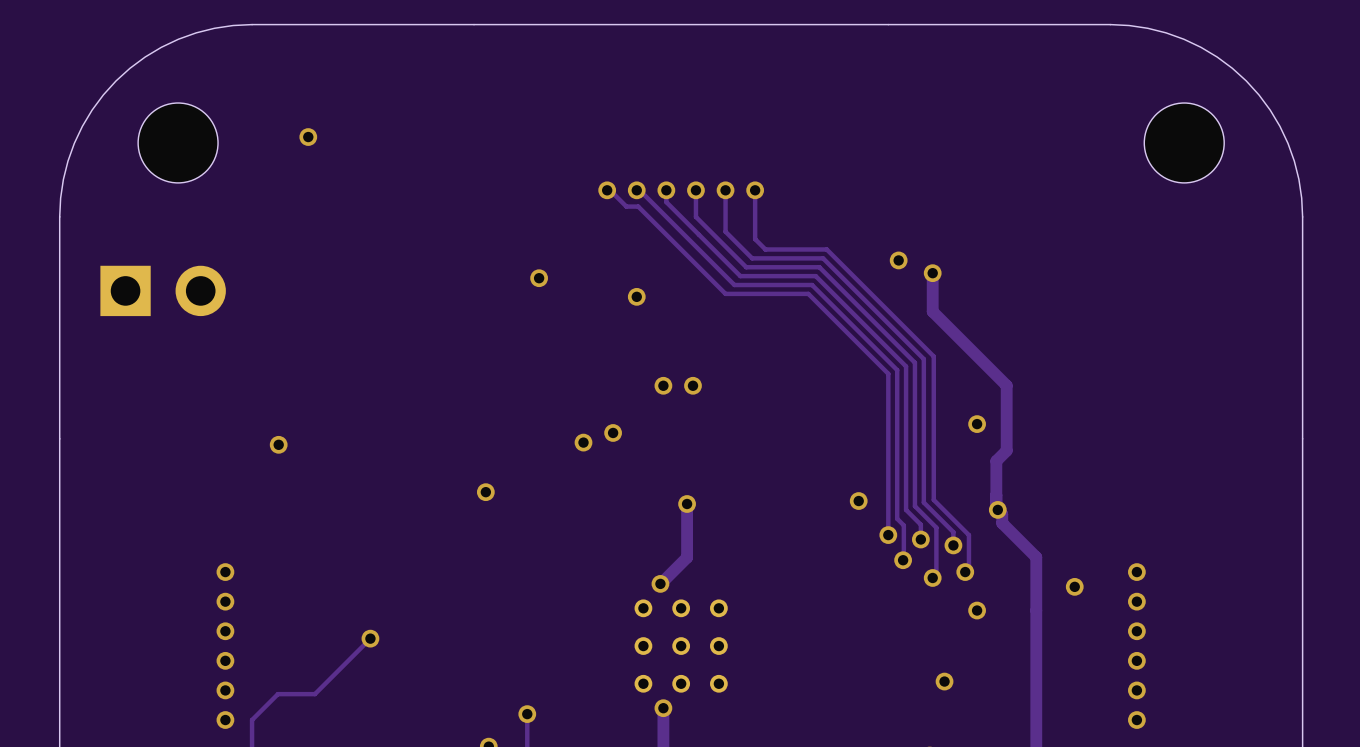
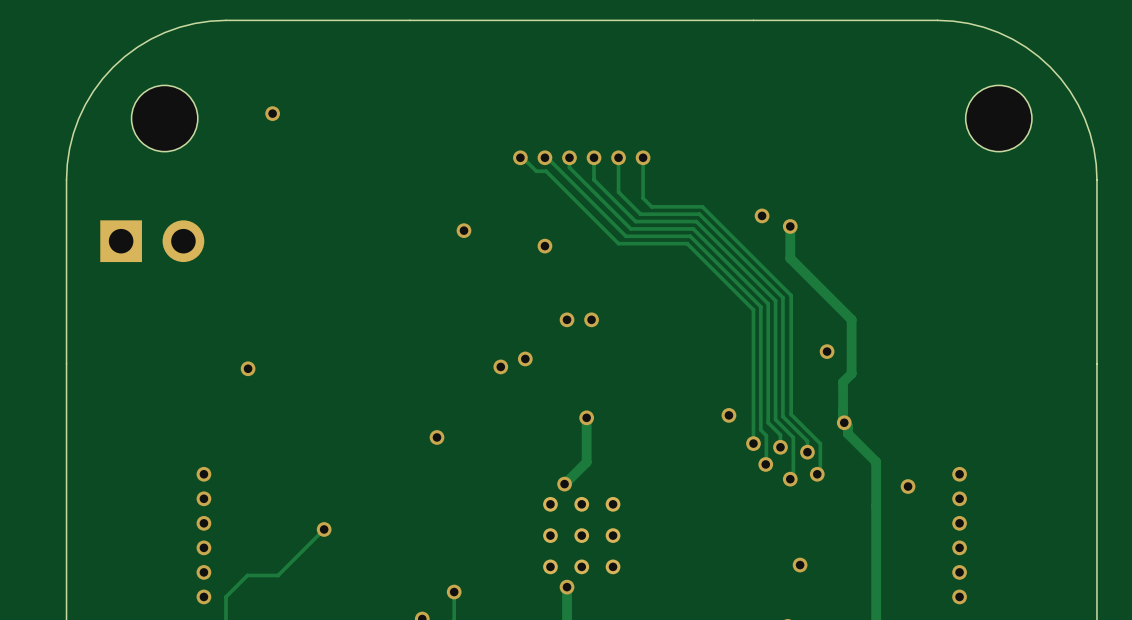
via position: (485, 492) -> (437, 437)
via: (977, 610) -> none

